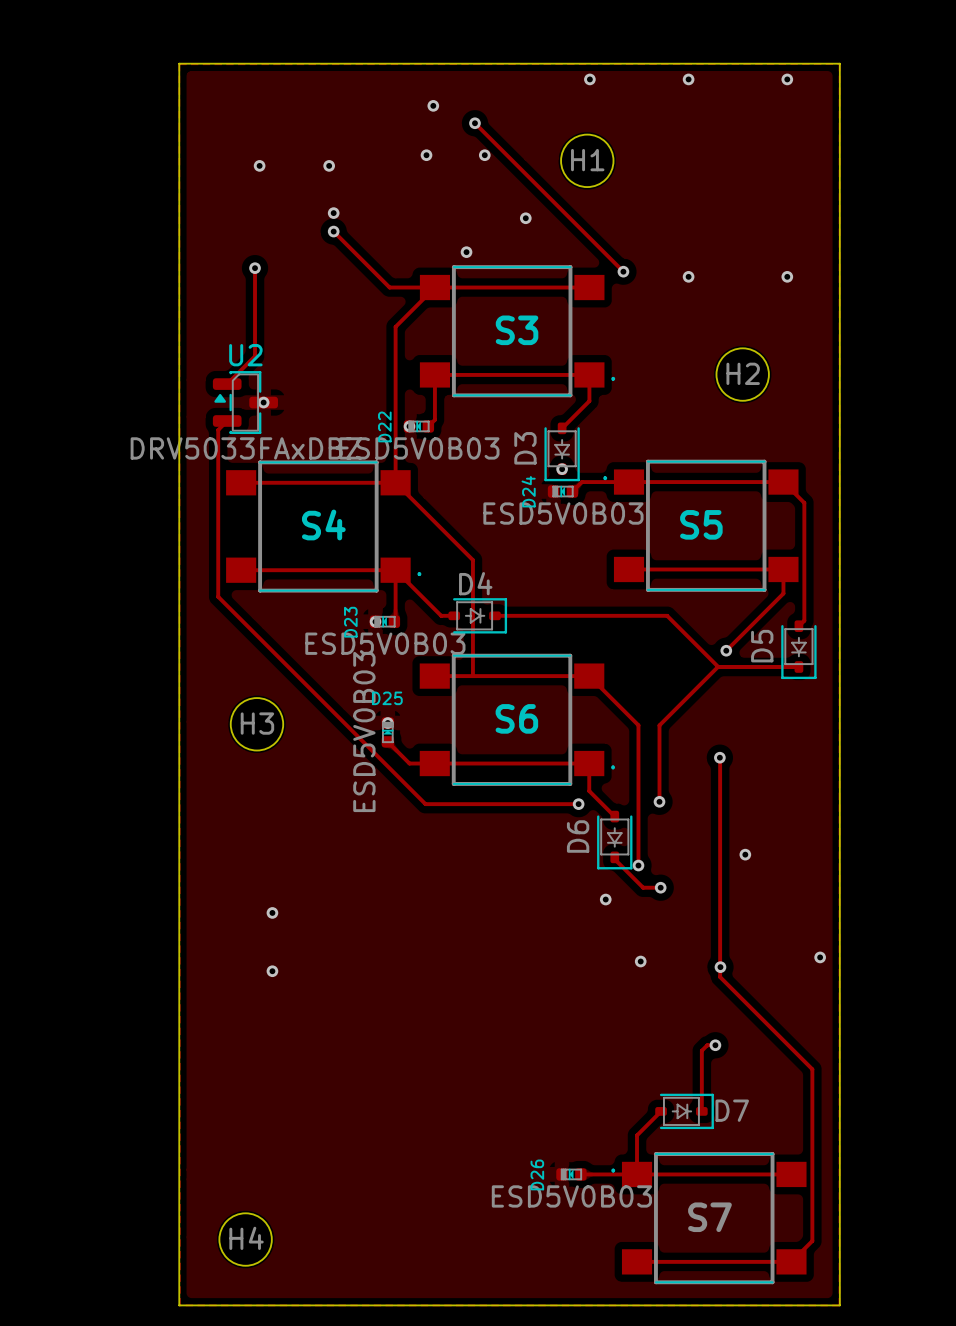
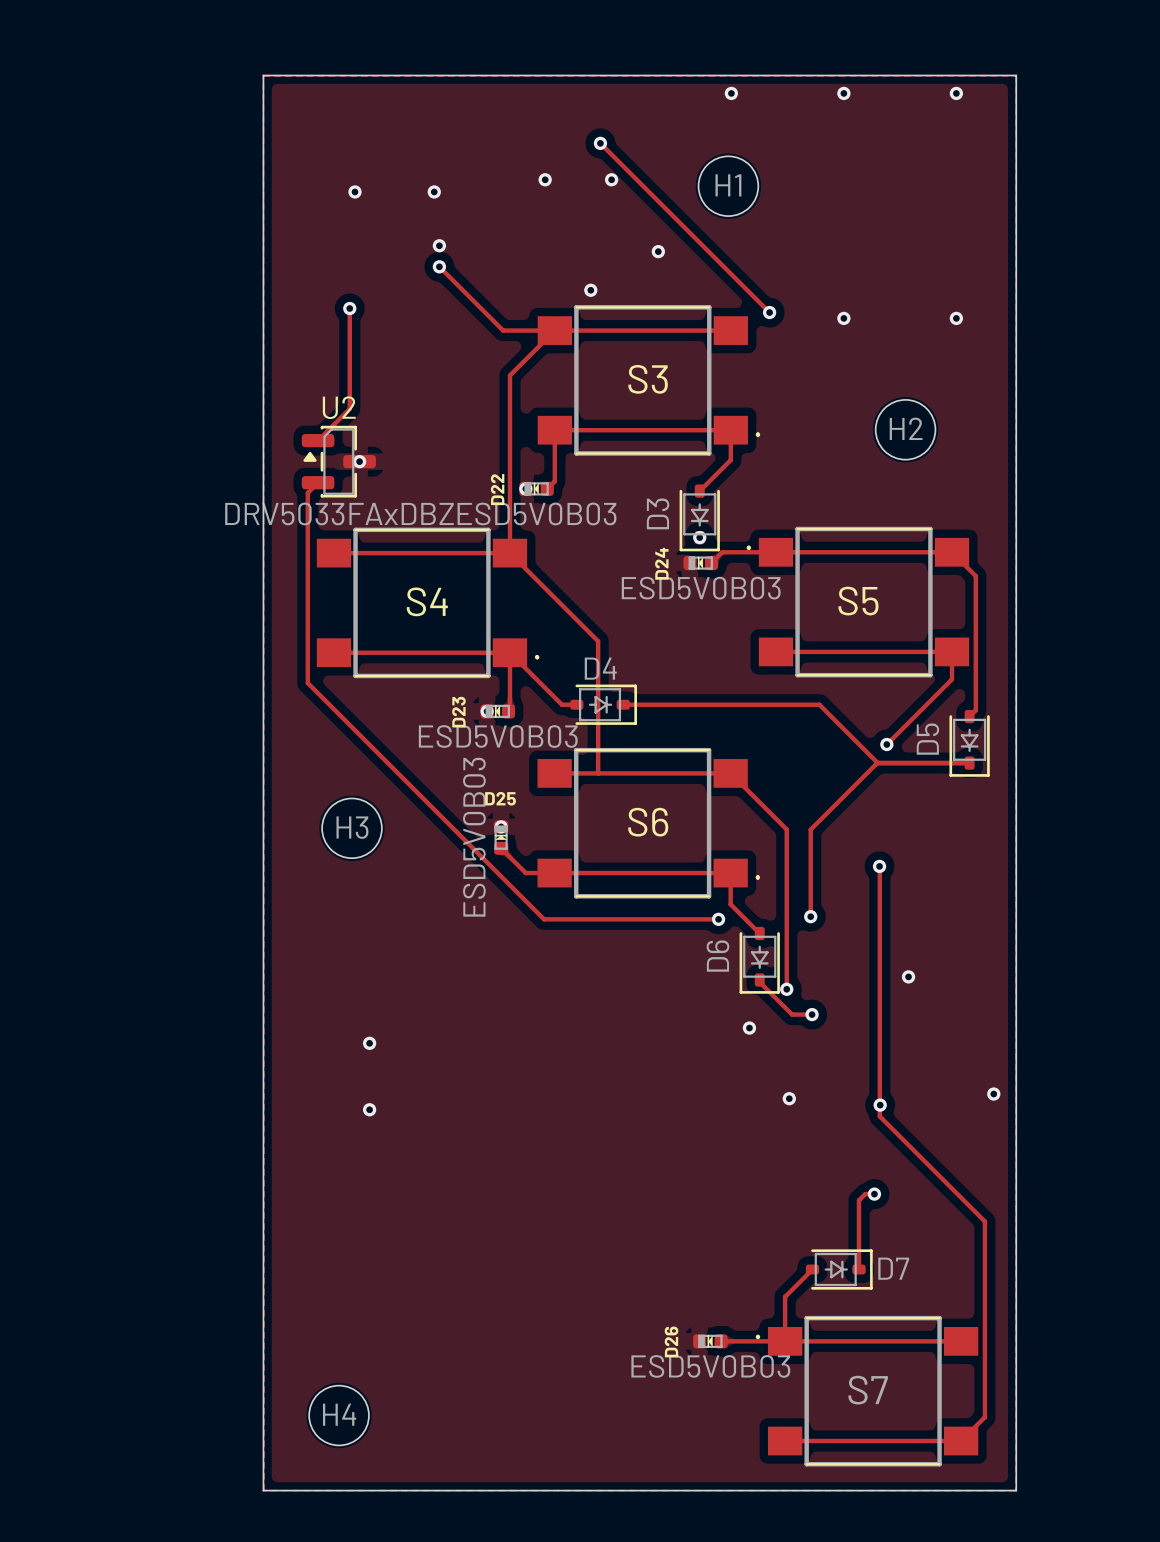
via: (433, 105) -> none

